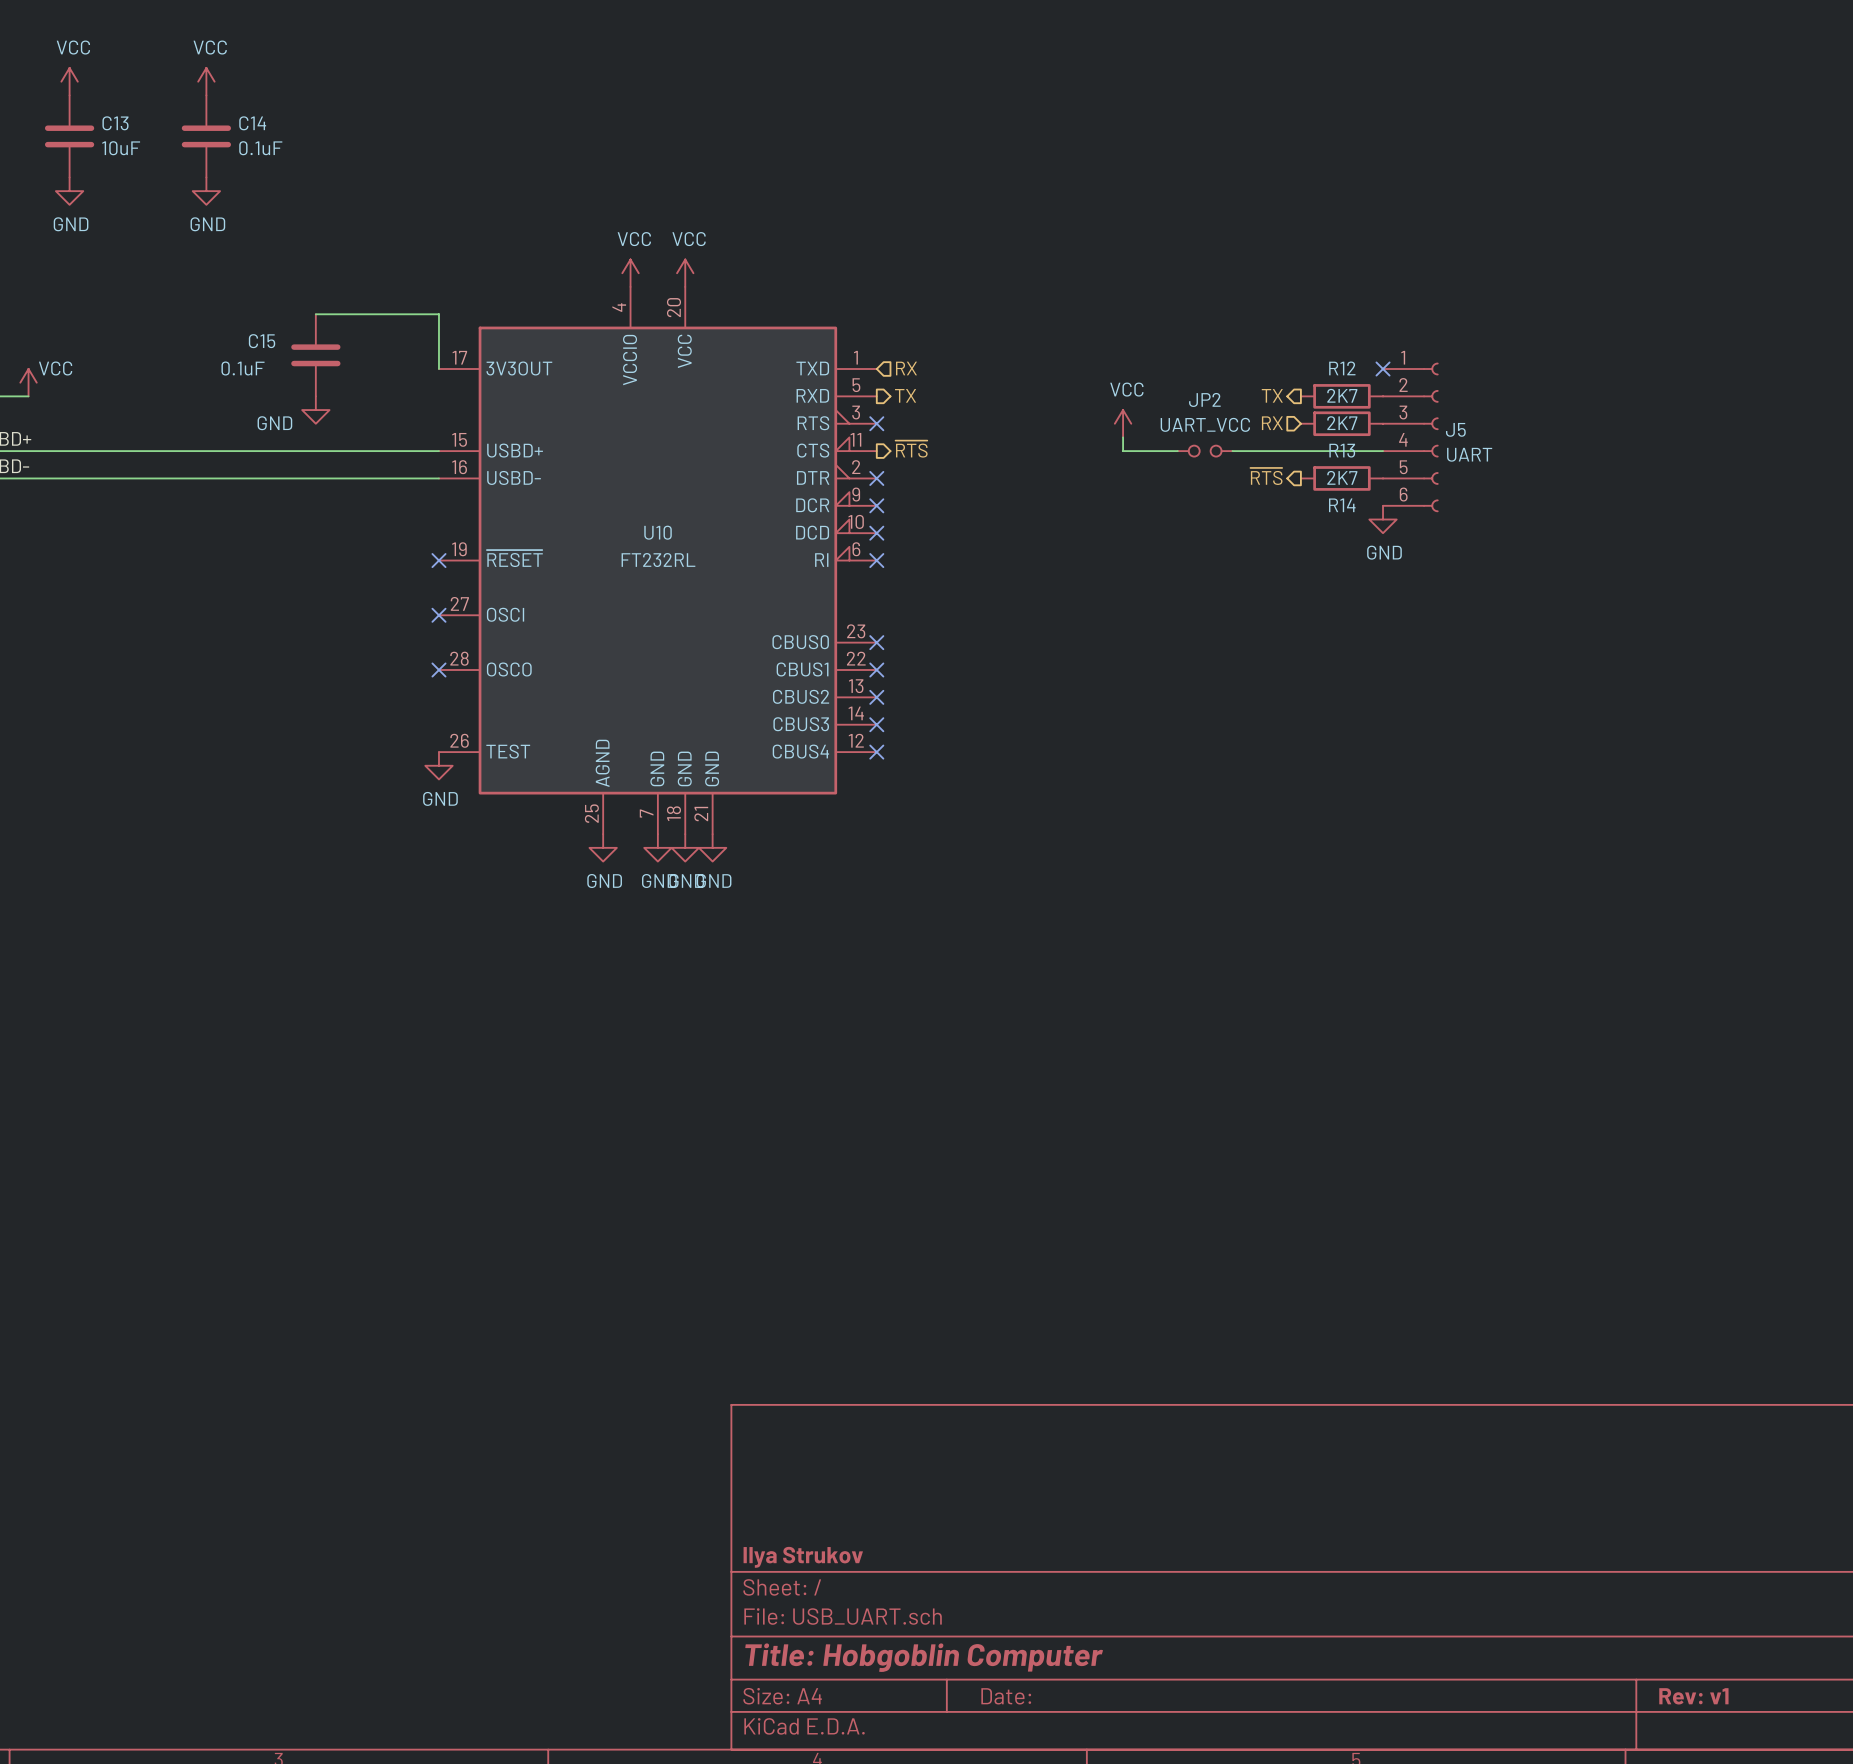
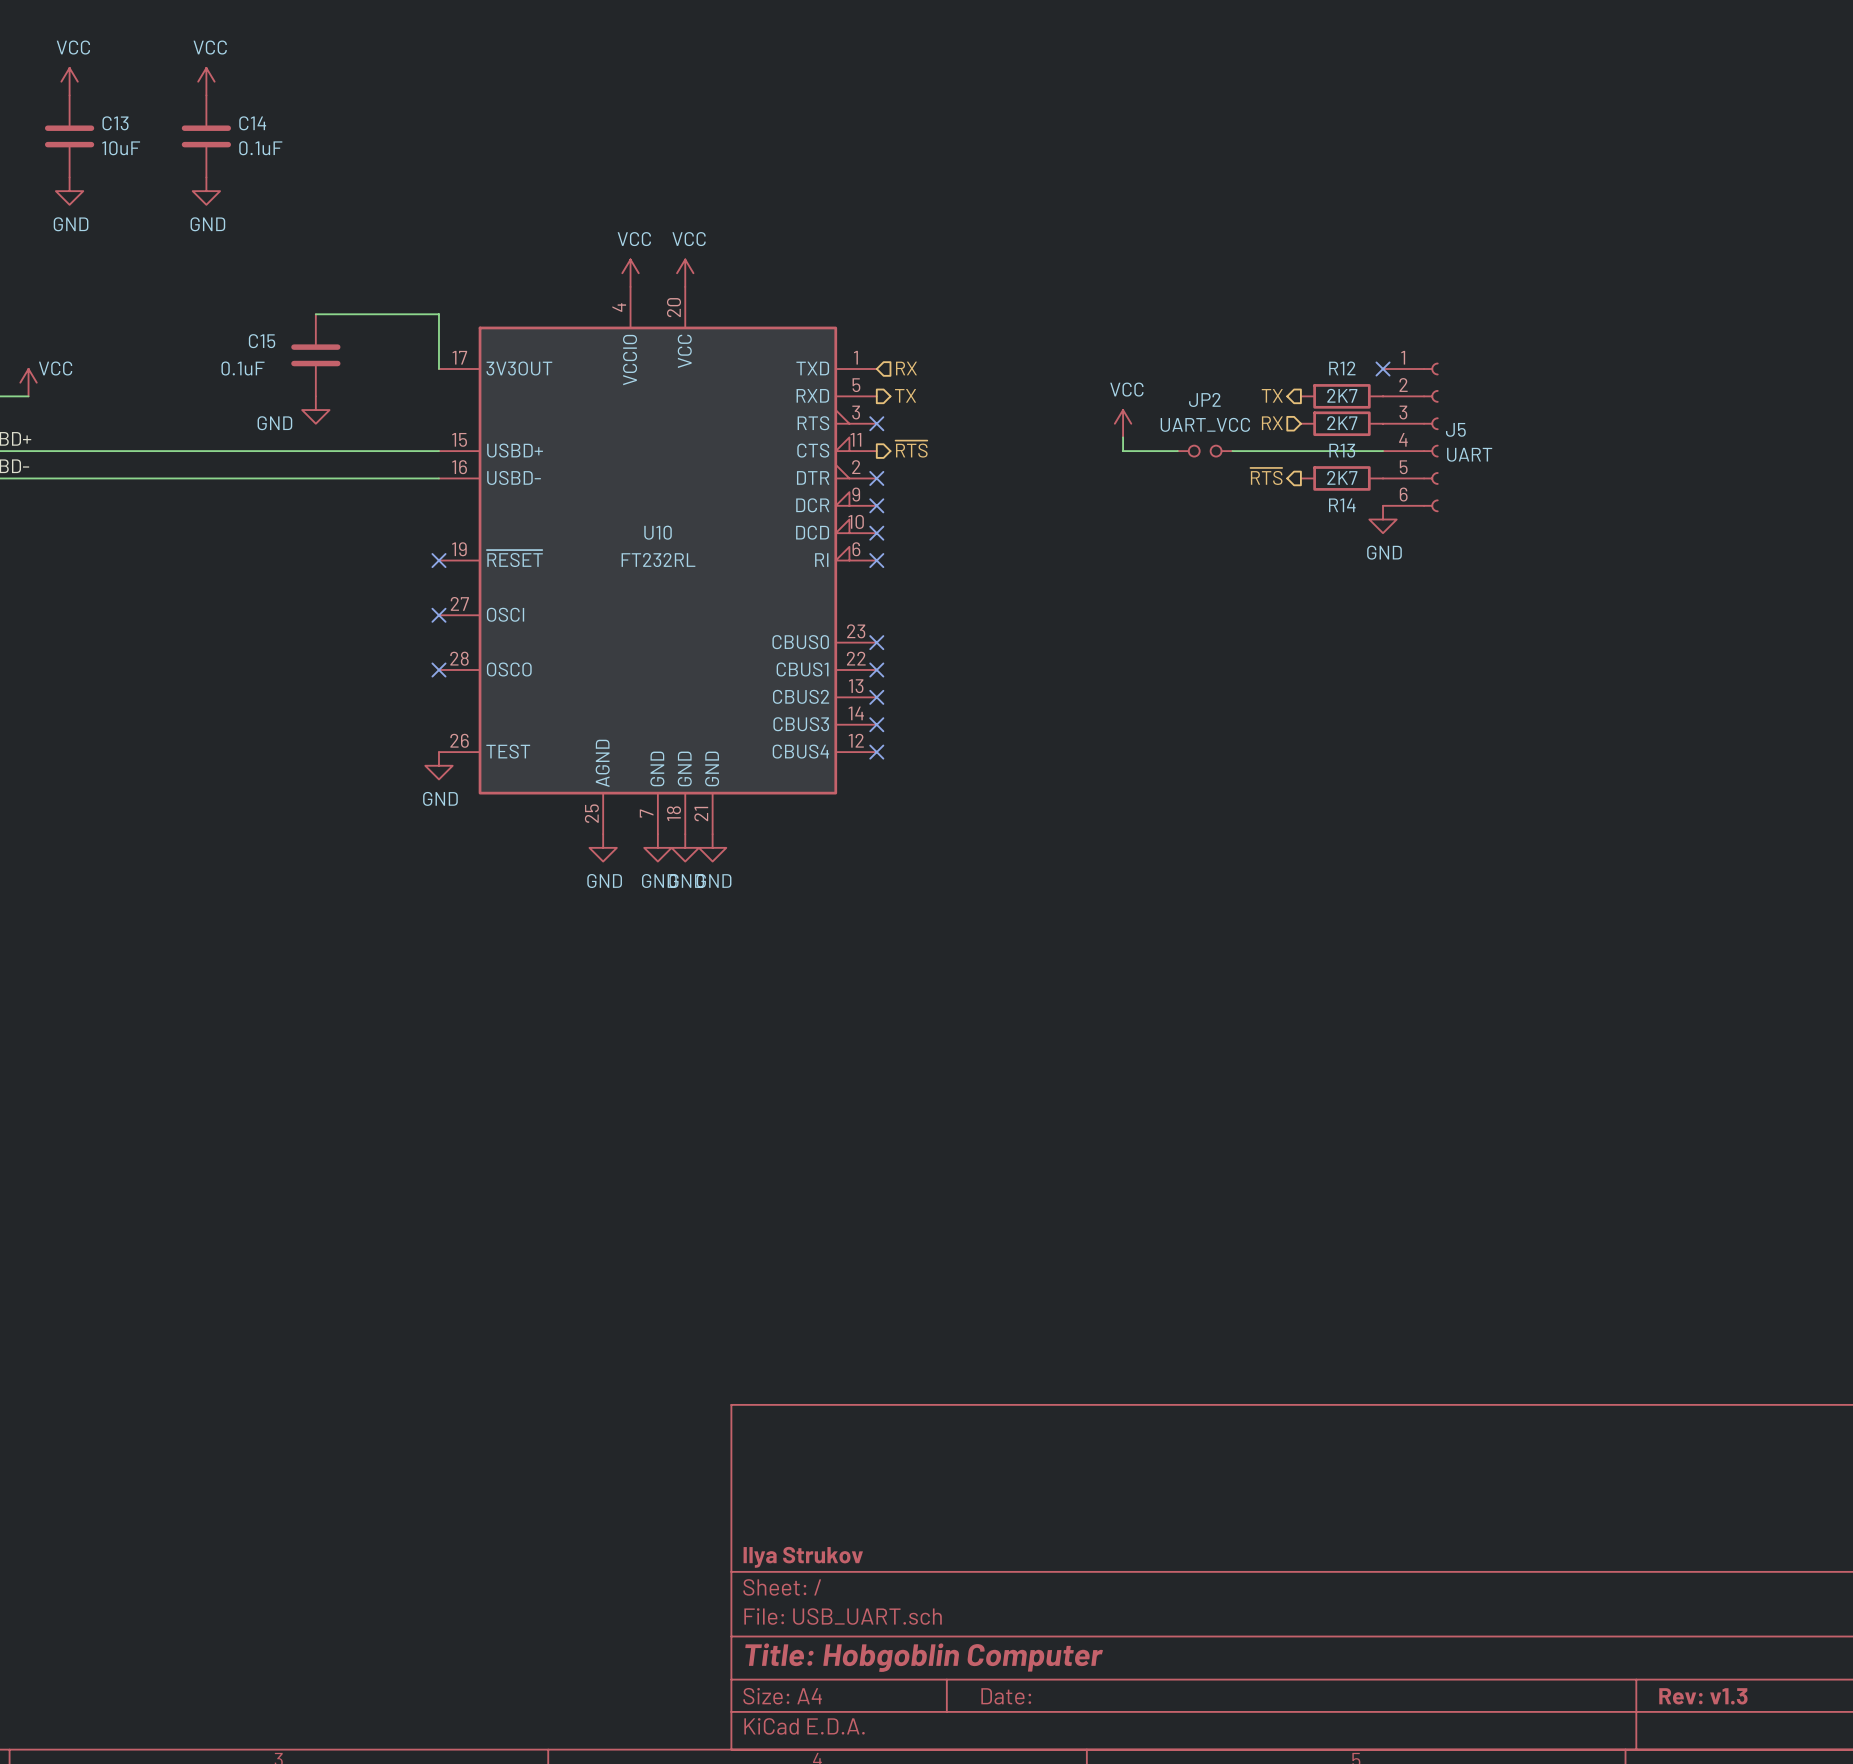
title block: Rev: v1 (1693, 1696) -> Rev: v1.3 (1703, 1696)

